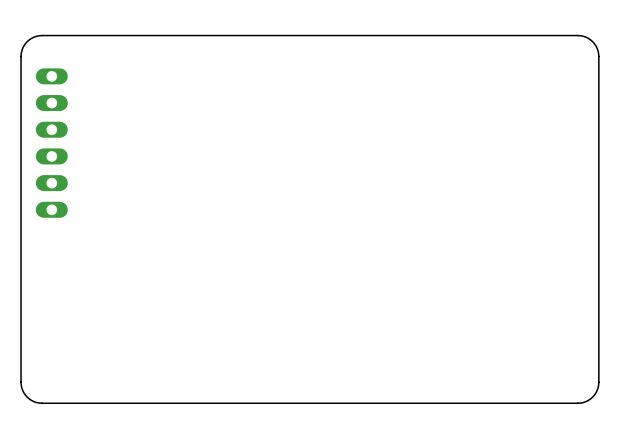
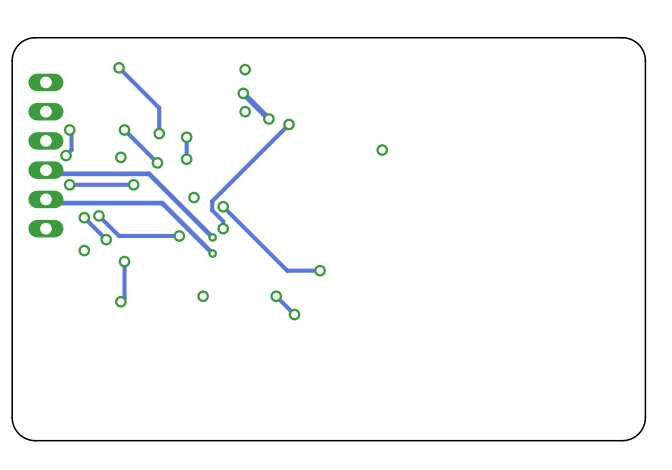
track: none -> (119, 67) (159, 108) (159, 133)
via: none -> (119, 67)
via: none -> (245, 69)
track: none -> (243, 93) (268, 119)
via: none -> (243, 93)
via: none -> (245, 111)
via: none -> (268, 119)
track: none -> (289, 124) (212, 201) (212, 210) (223, 221) (223, 228)
via: none -> (289, 124)
track: none -> (69, 129) (71, 131) (71, 150) (66, 155)
via: none -> (69, 129)
track: none -> (124, 129) (157, 162)
via: none -> (124, 129)
via: none -> (159, 133)
track: none -> (186, 137) (186, 159)
via: none -> (186, 137)
via: none -> (382, 150)
via: none -> (66, 155)
via: none -> (120, 157)
via: none -> (186, 159)
via: none -> (157, 162)
track: none -> (42, 173) (149, 173) (212, 237)
via: none -> (69, 184)
track: none -> (133, 184) (69, 184)
via: none -> (133, 184)
via: none -> (193, 197)
track: none -> (42, 203) (162, 203) (212, 253)
track: none -> (223, 206) (287, 270) (320, 270)
via: none -> (223, 206)
track: none -> (98, 215) (119, 235) (179, 235)
via: none -> (98, 215)
track: none -> (84, 217) (106, 239)
via: none -> (84, 217)
via: none -> (223, 228)
via: none -> (179, 235)
via: none -> (212, 237)
via: none -> (106, 239)
via: none -> (84, 250)
via: none -> (212, 253)
track: none -> (124, 261) (124, 298) (120, 301)
via: none -> (124, 261)
via: none -> (320, 270)
via: none -> (203, 296)
track: none -> (276, 296) (294, 314)
via: none -> (276, 296)
via: none -> (120, 301)
via: none -> (294, 314)

